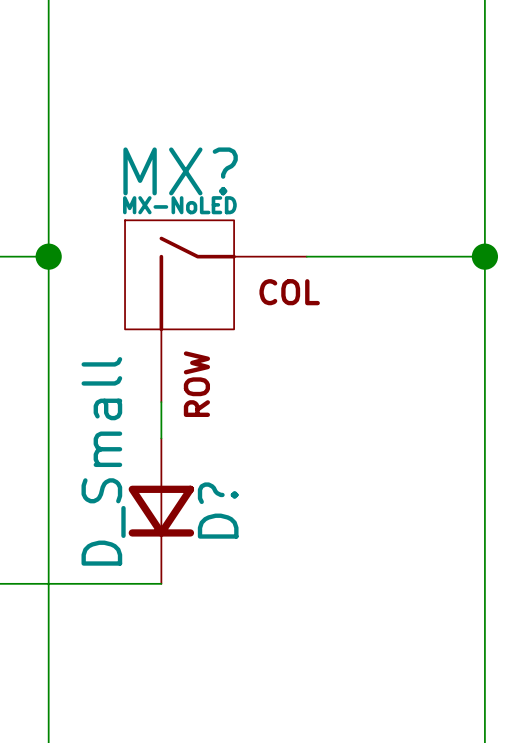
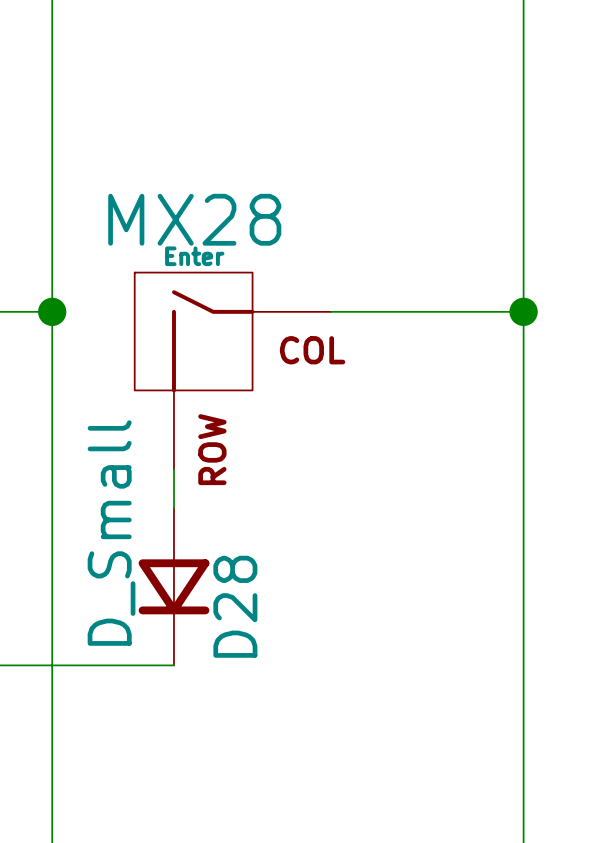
MX? name: MX? (180, 171) -> MX28 (194, 219)
MX? value: MX-NoLED (179, 205) -> Enter (194, 256)
D? name: D? (218, 510) -> D28 (235, 606)

